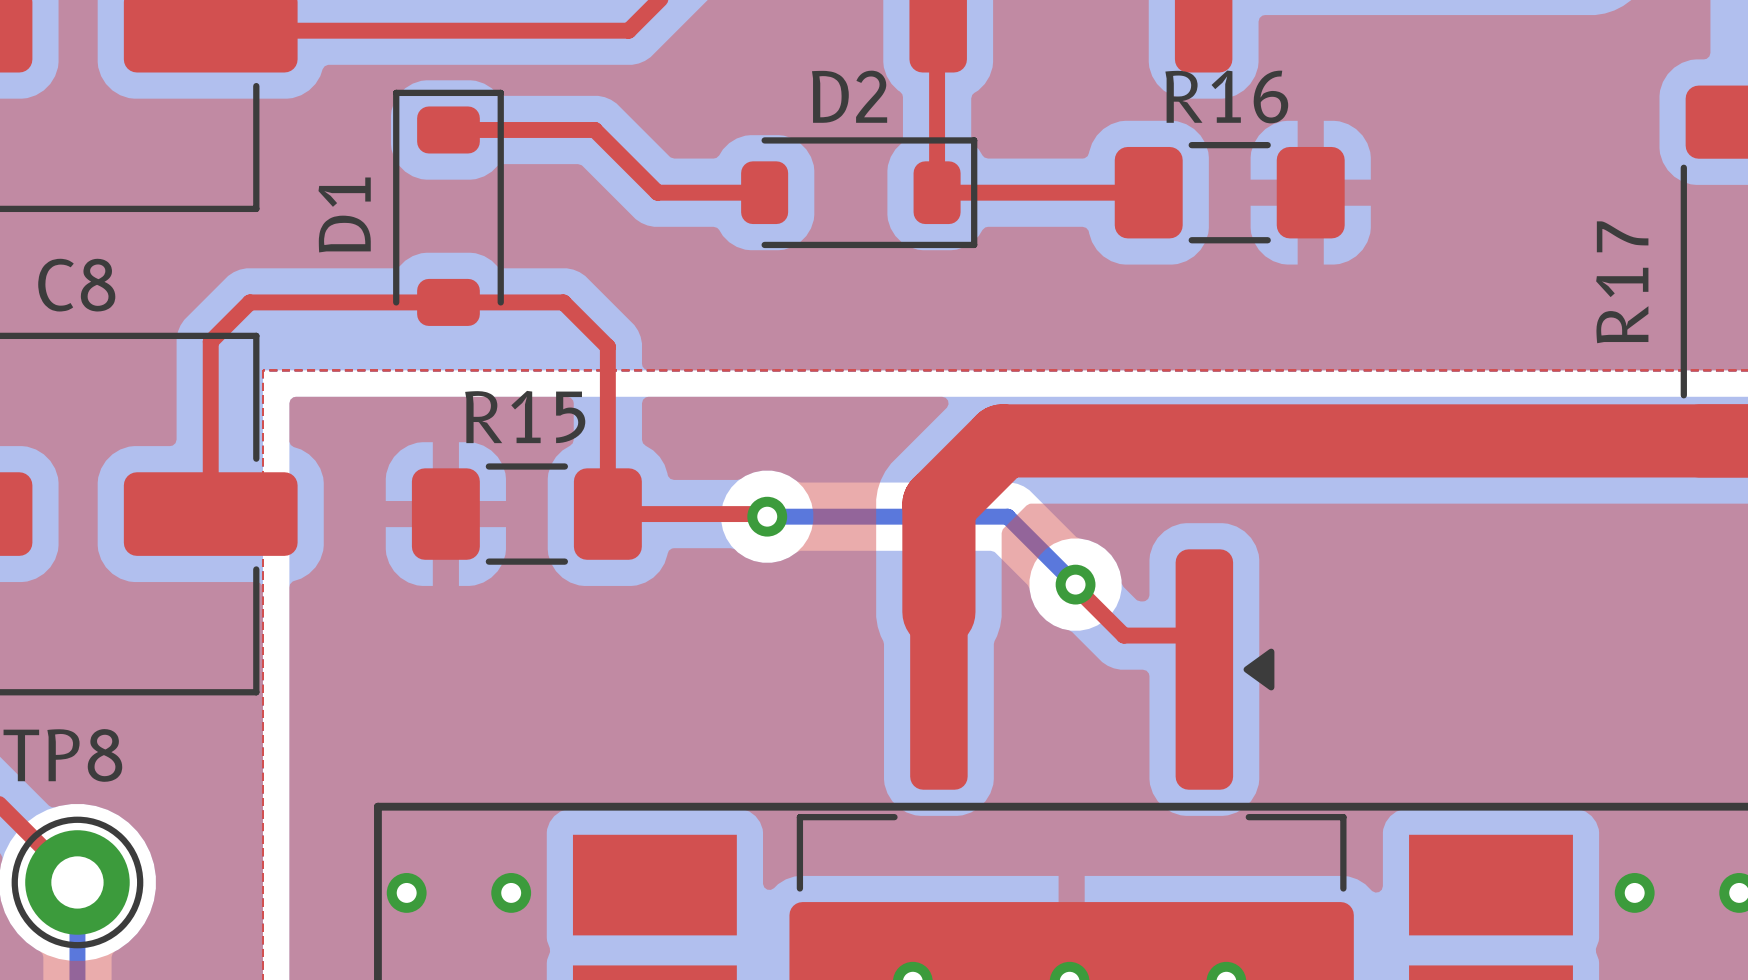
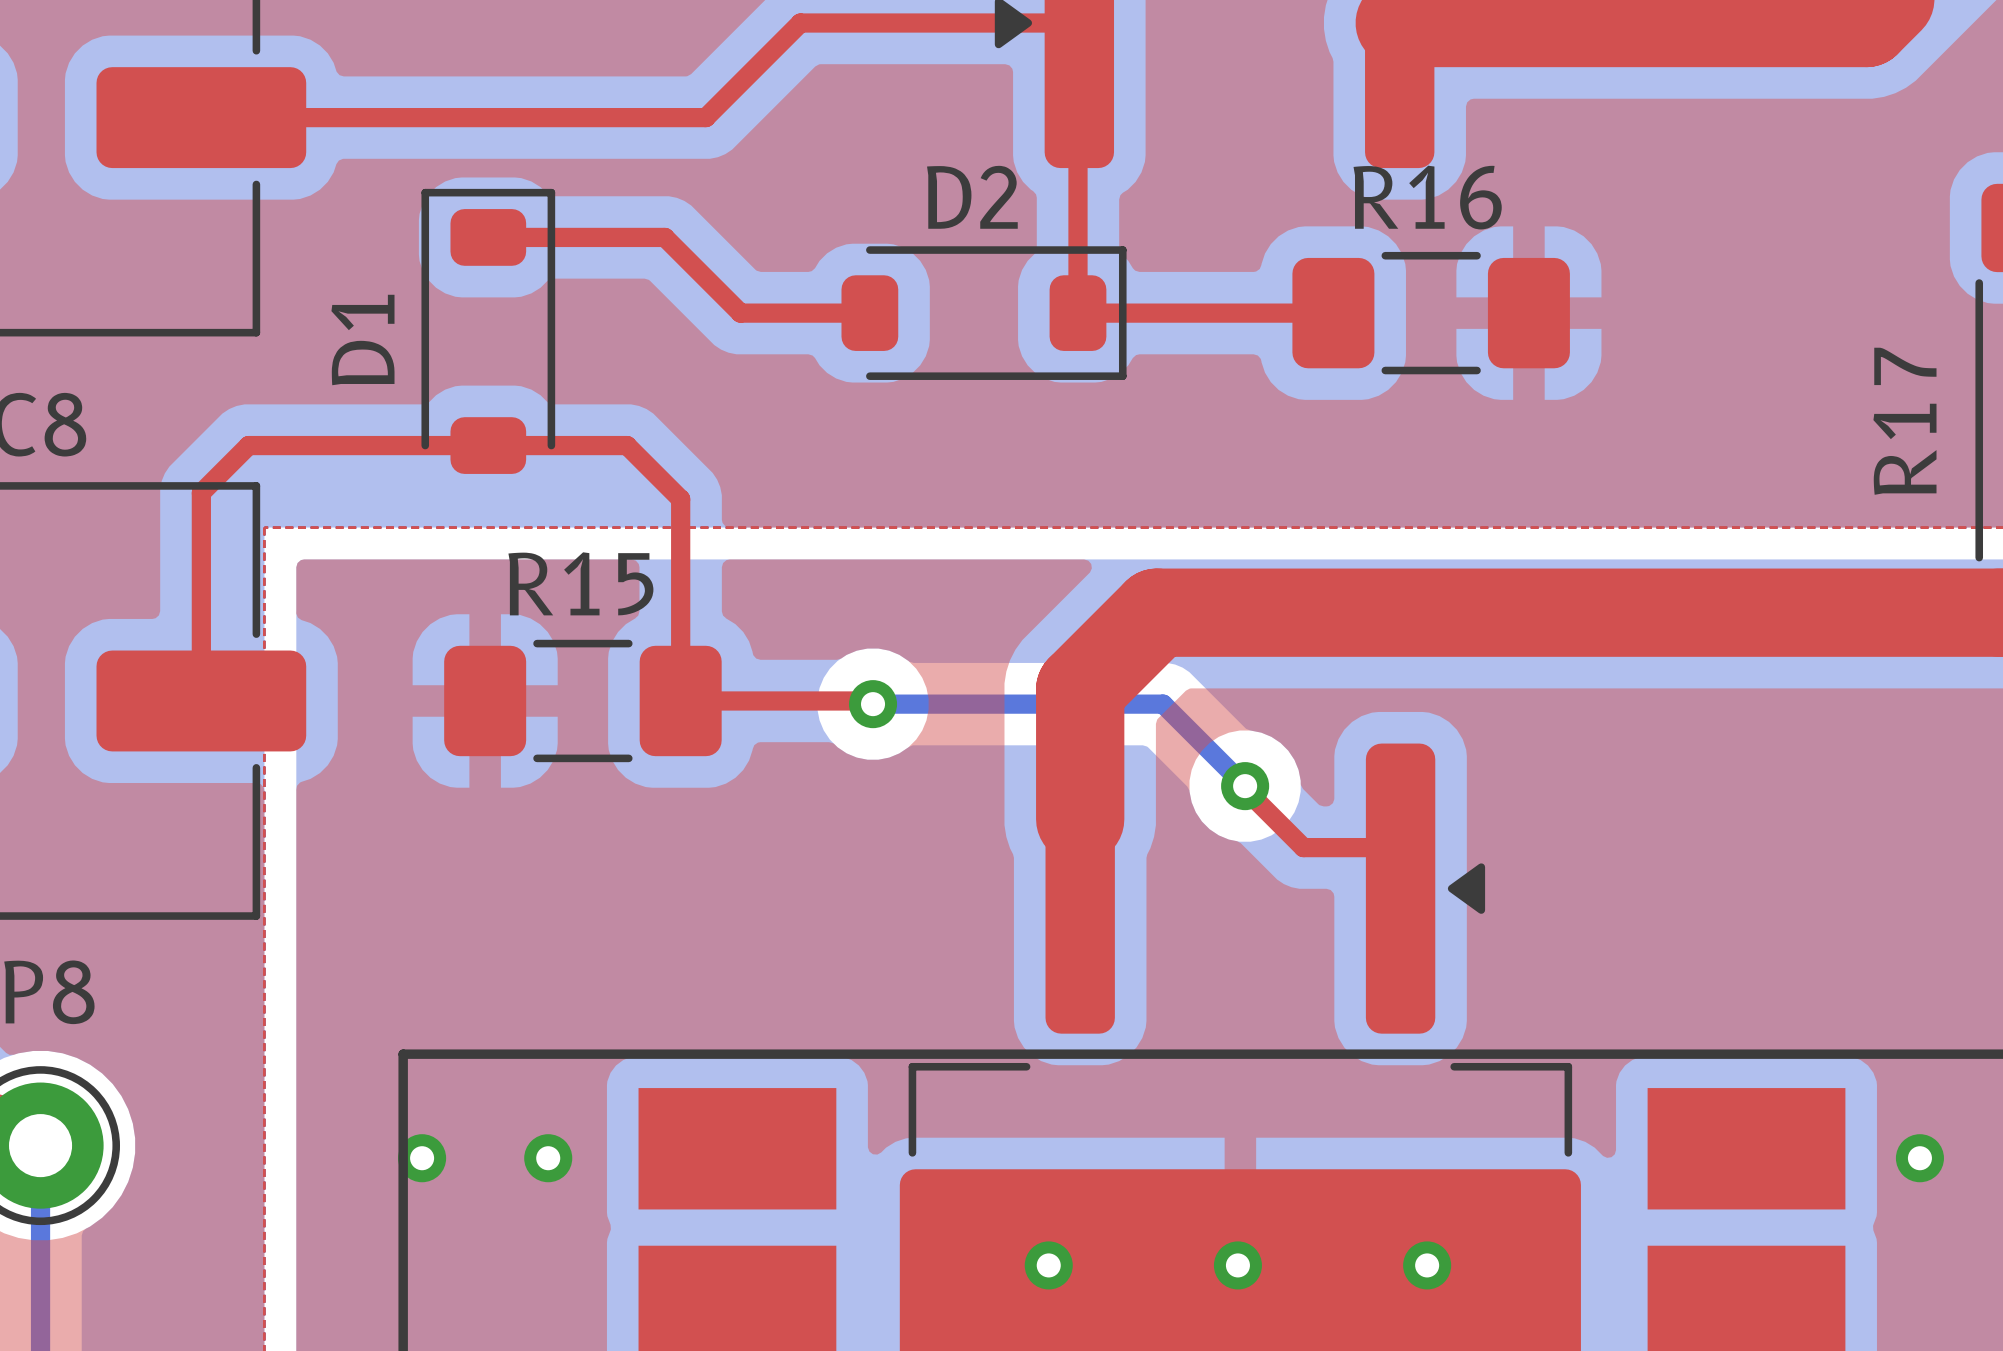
via position: (406, 892) -> (422, 1158)
via position: (511, 892) -> (548, 1158)

